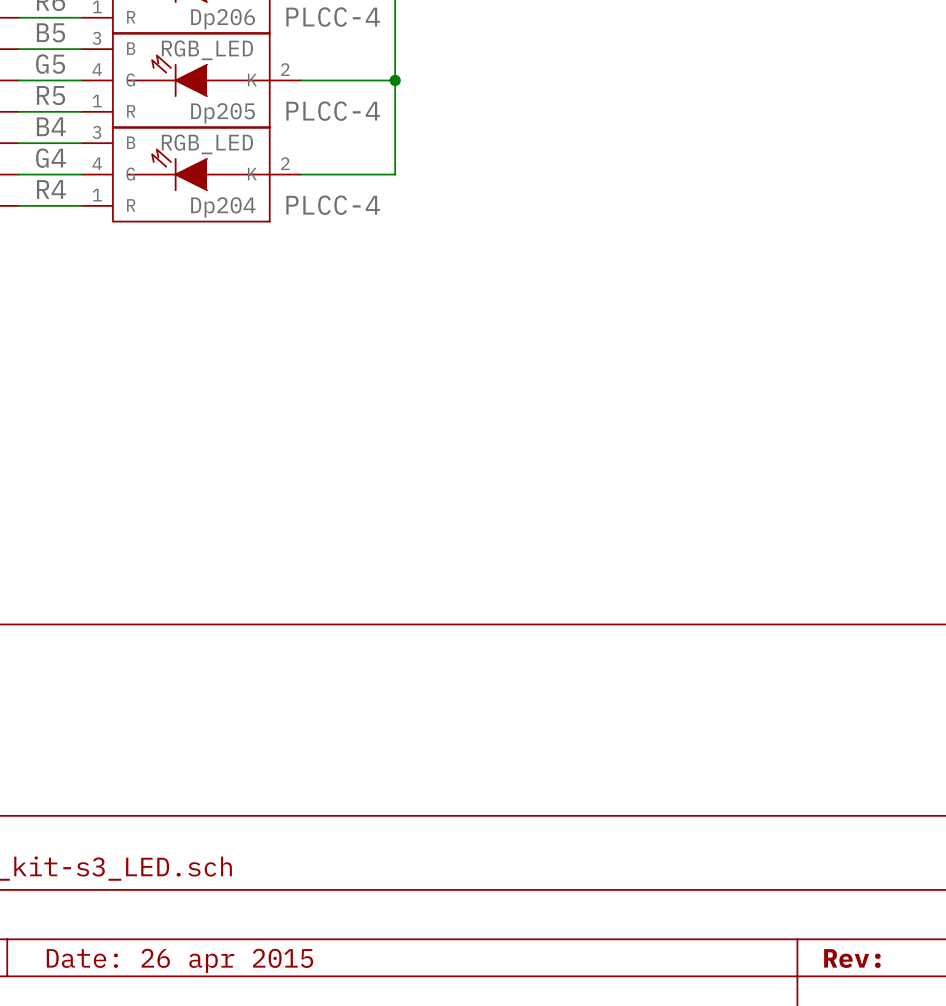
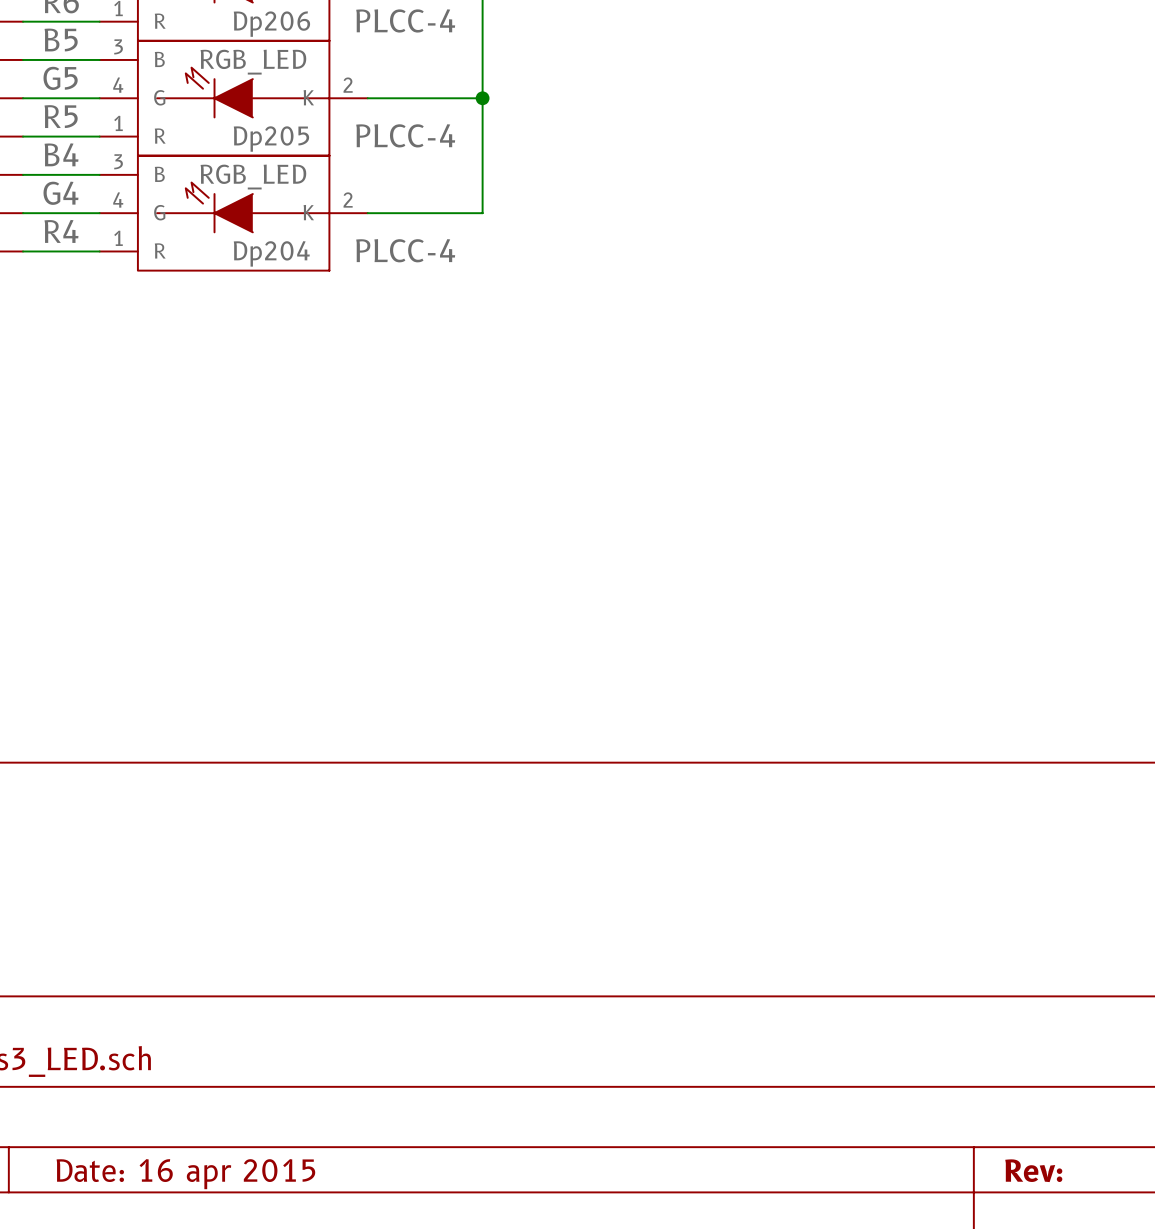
title block: Date: 26 apr 2015 (179, 960) -> Date: 16 apr 2015 (185, 1174)

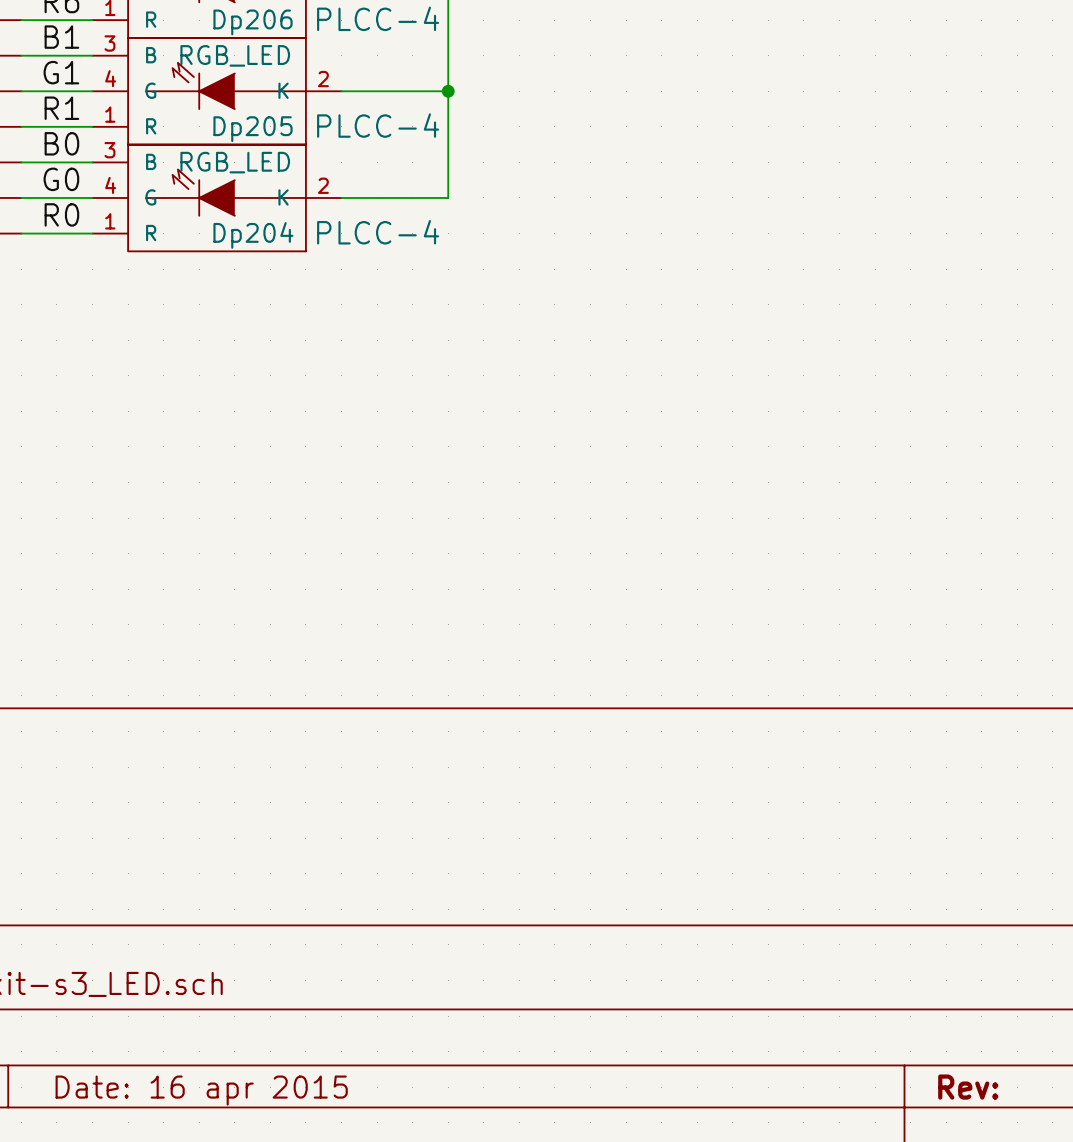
label: B5 (61, 40) -> B1 (61, 37)
label: G5 (60, 78) -> G1 (61, 72)
label: R5 (61, 116) -> R1 (61, 108)
label: B4 (61, 154) -> B0 (61, 143)
label: G4 (60, 193) -> G0 (61, 179)
label: R4 (61, 231) -> R0 (61, 214)

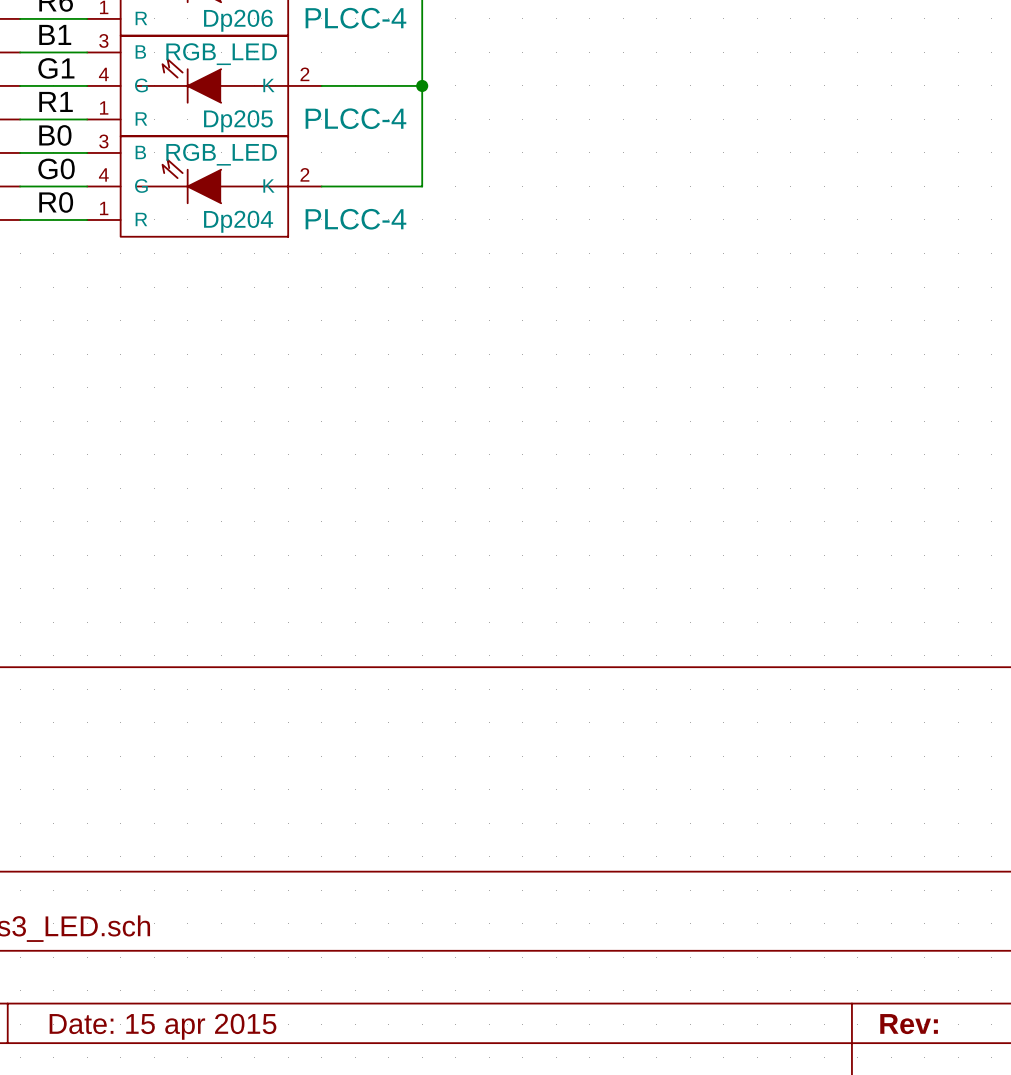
title block: Date: 16 apr 2015 (201, 1090) -> Date: 15 apr 2015 (163, 1026)

